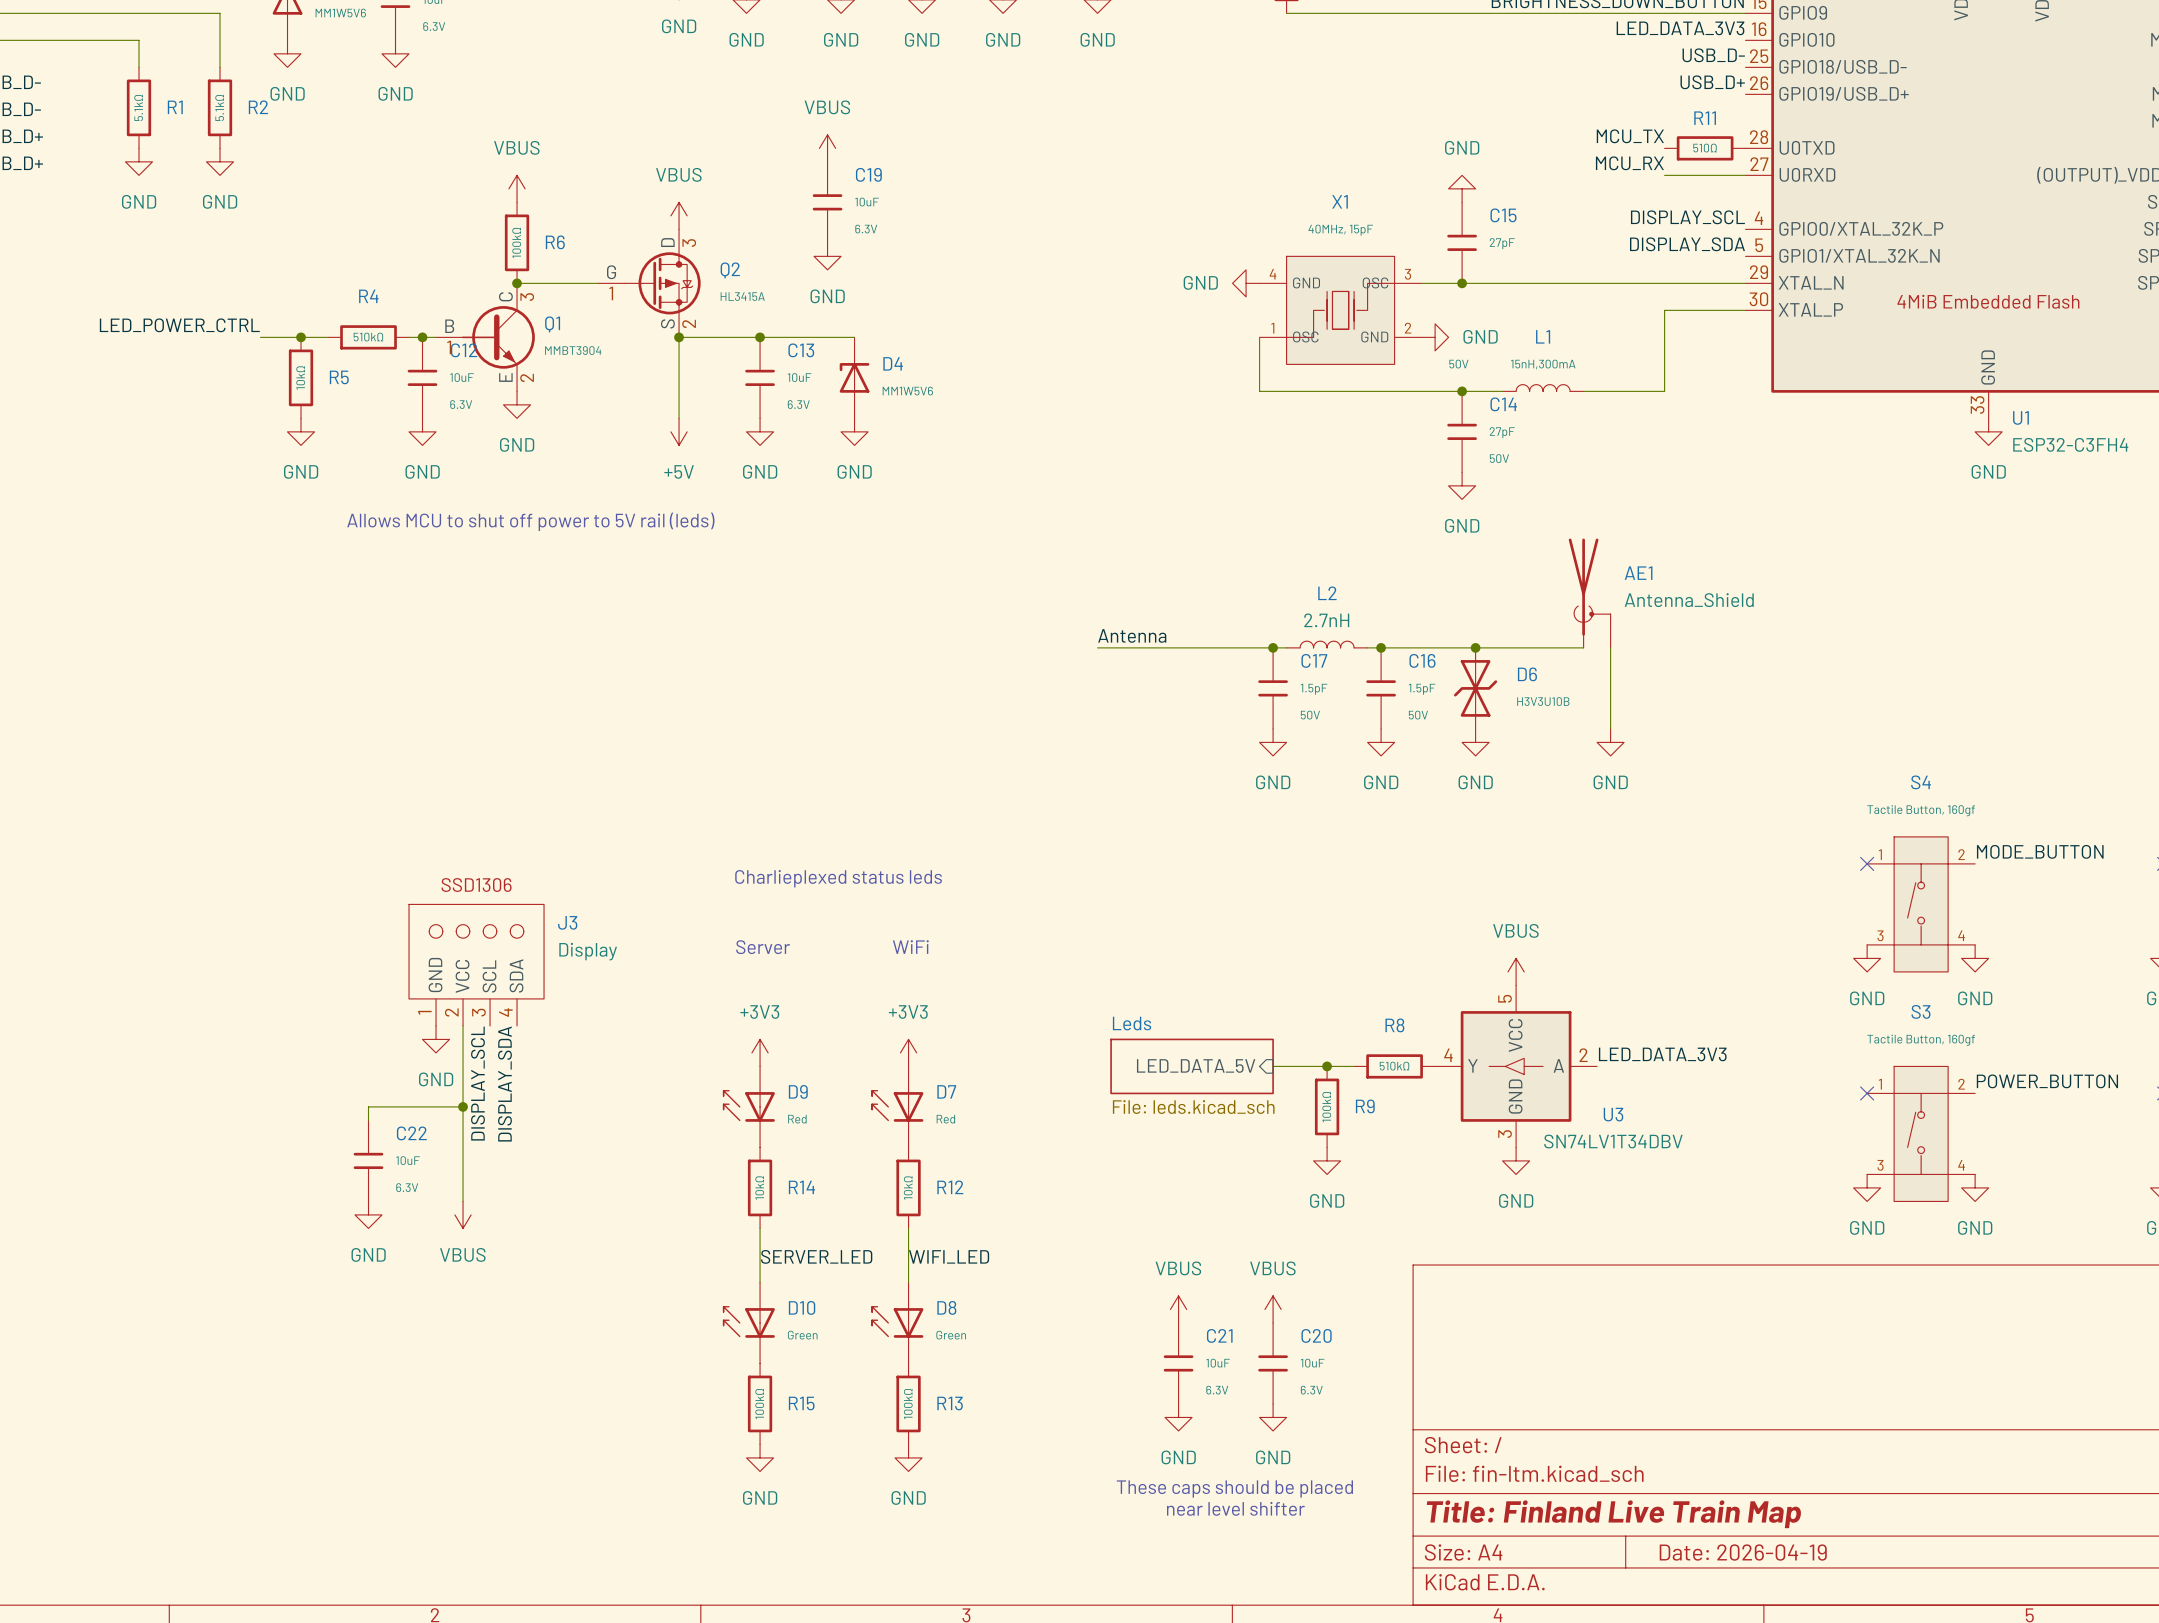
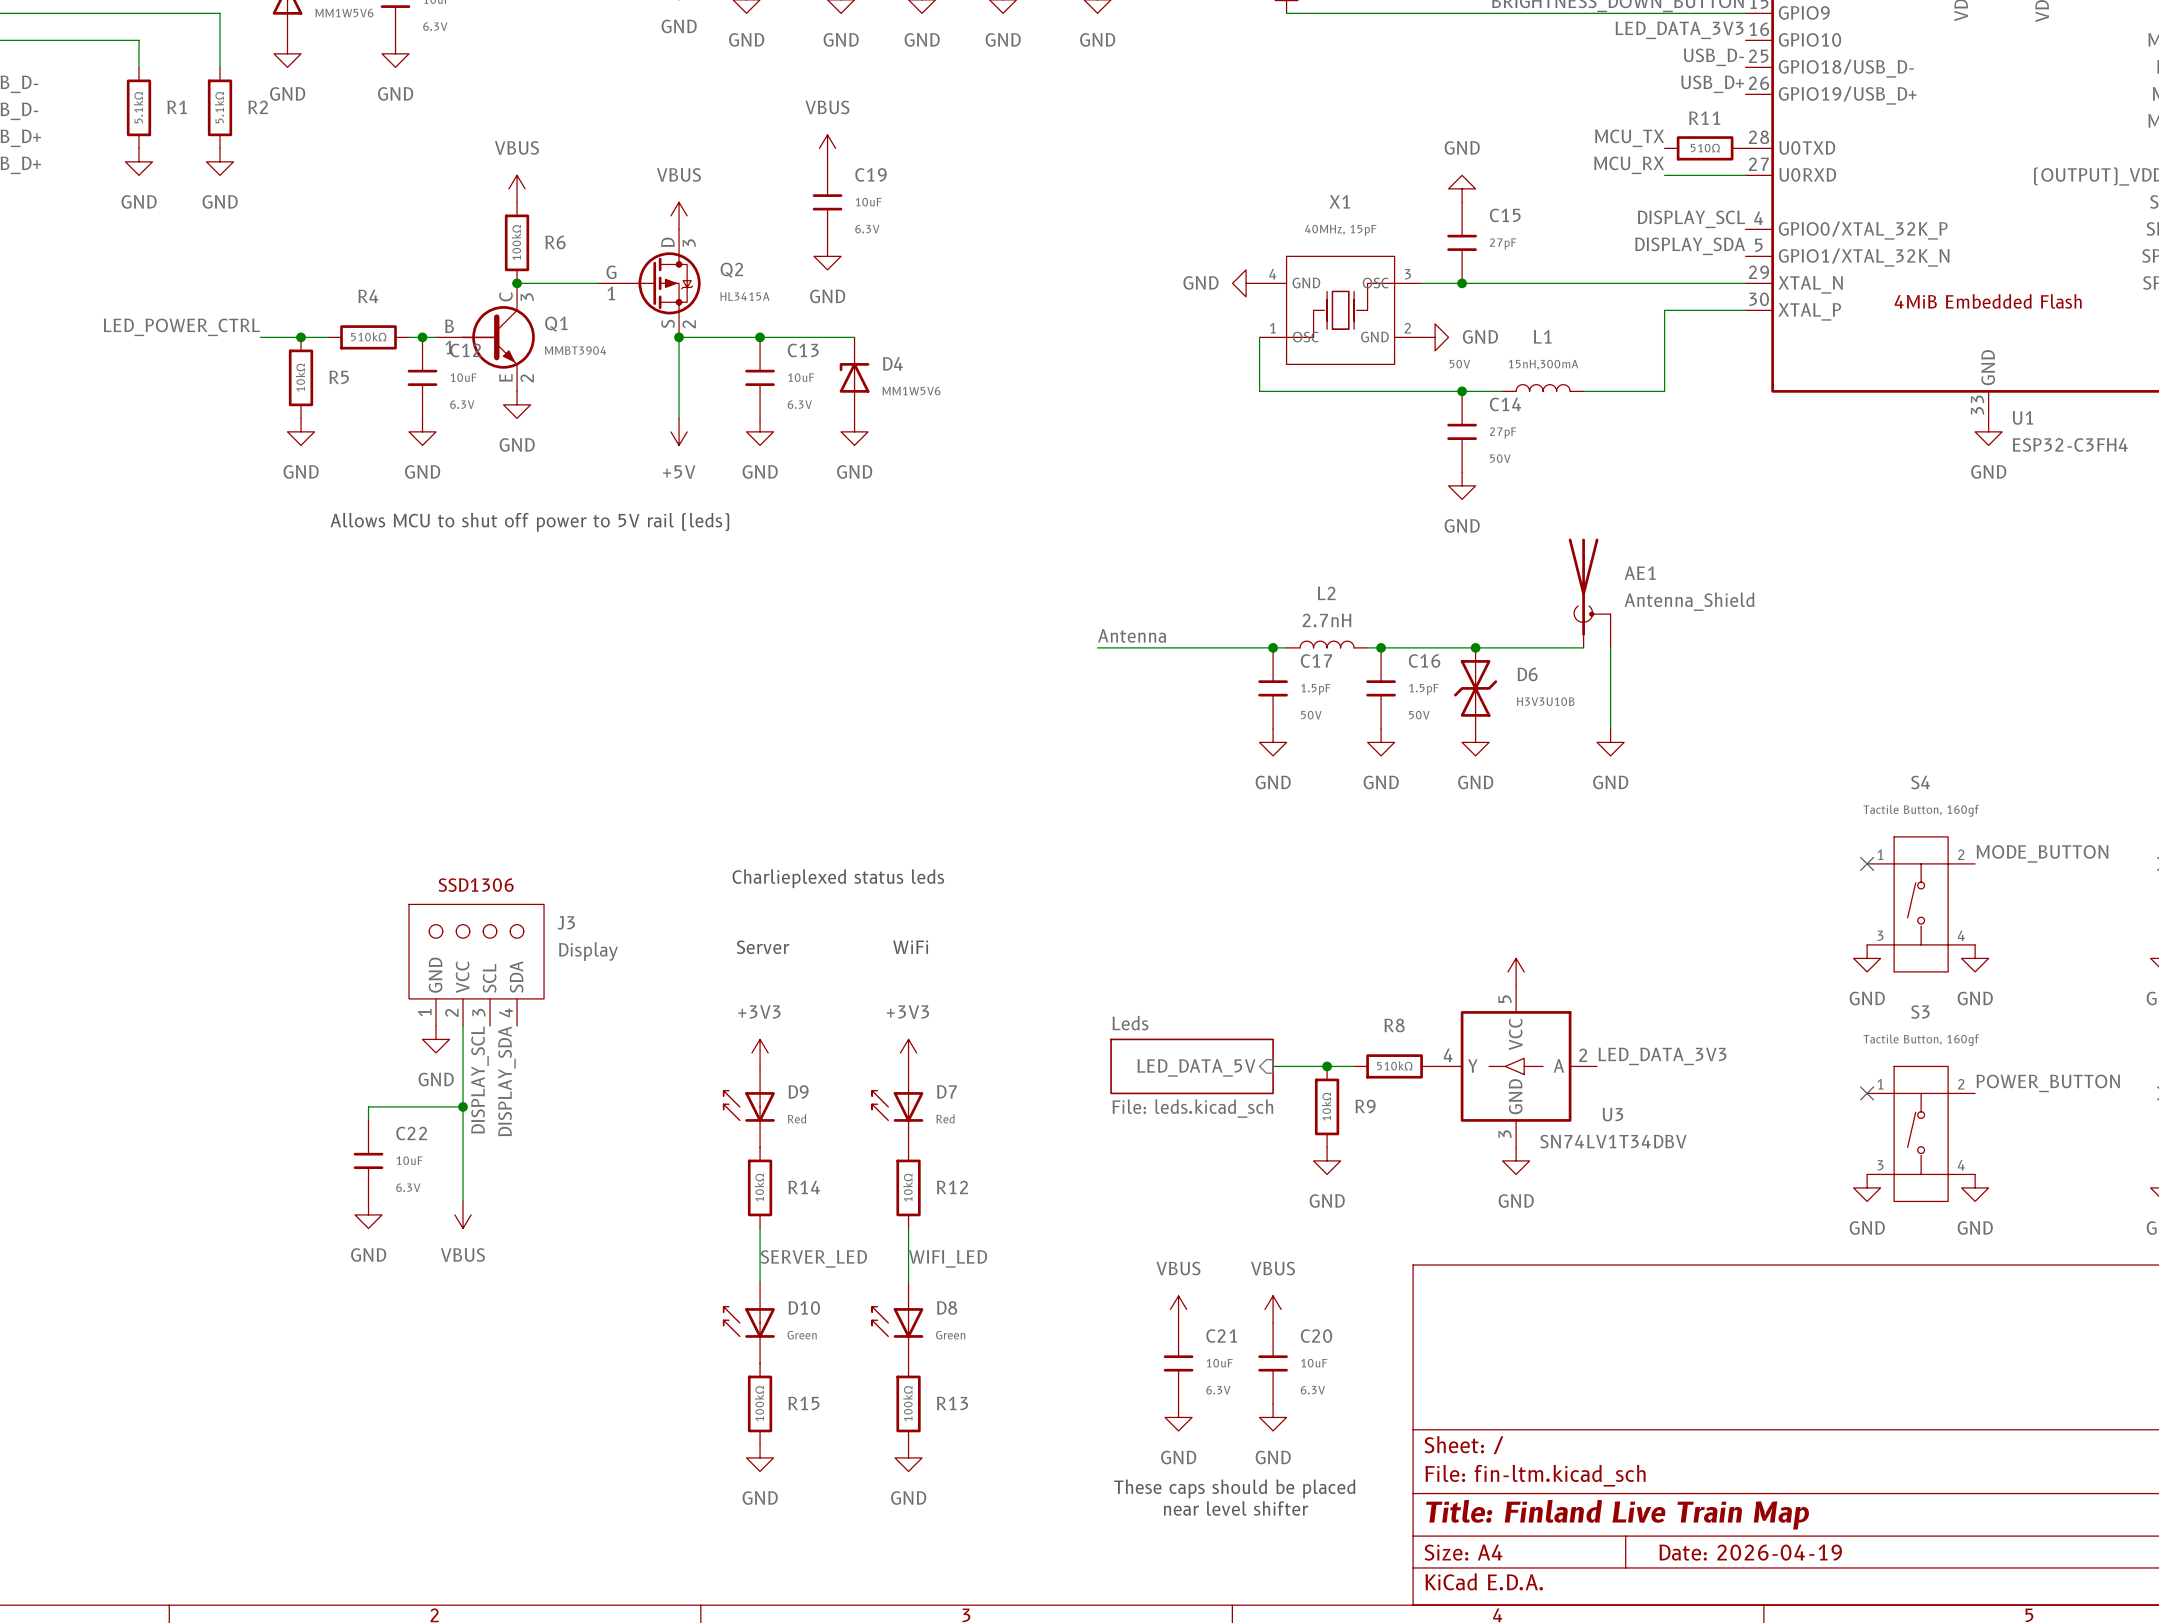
power symbol text: VBUS (1515, 930) -> none
R9 value: 100kΩ (1326, 1107) -> 10kΩ (1326, 1106)

